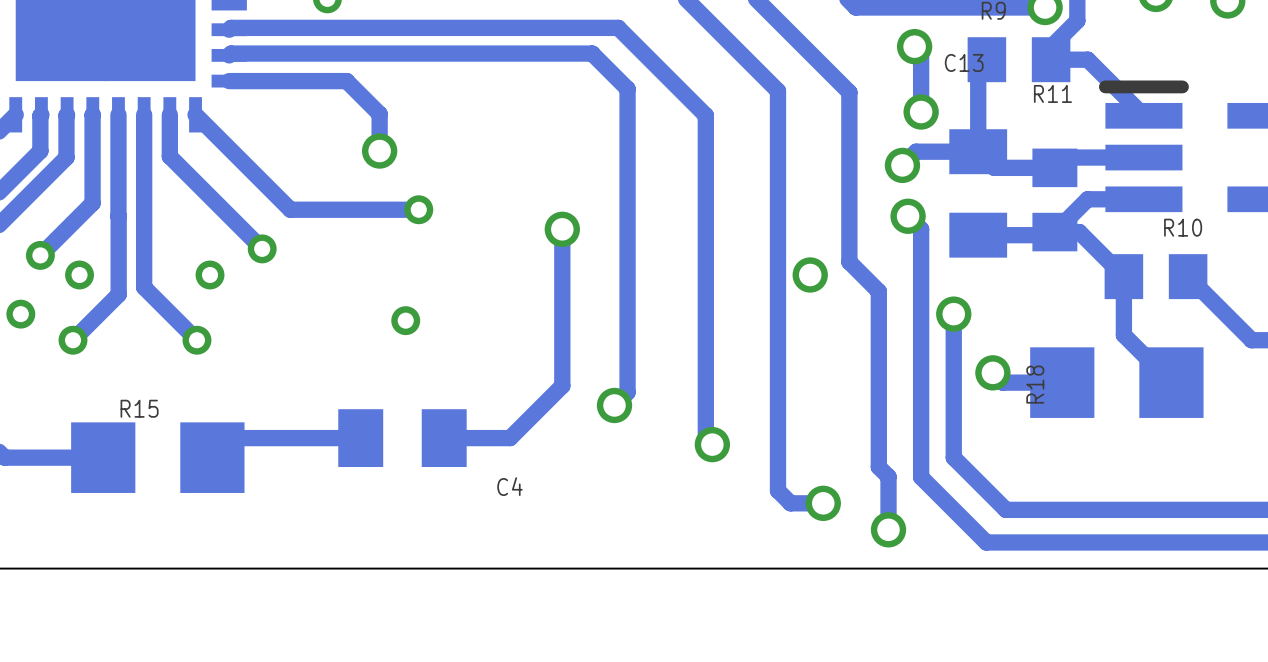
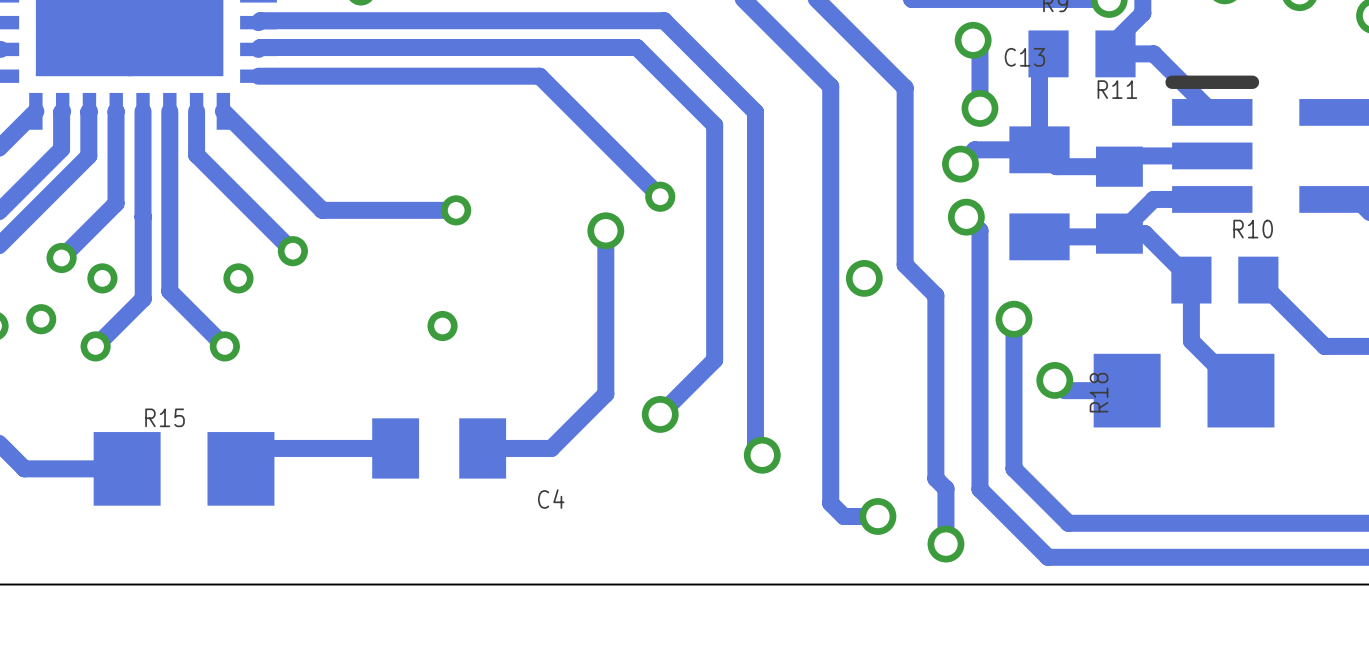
track: (346, 81) (379, 114) (379, 151) -> (380, 76) (539, 76) (660, 196)
track: (627, 88) (627, 392) -> (673, 84) (714, 125) (714, 360) (673, 400)
via: (379, 151) -> none
via: none -> (660, 196)

